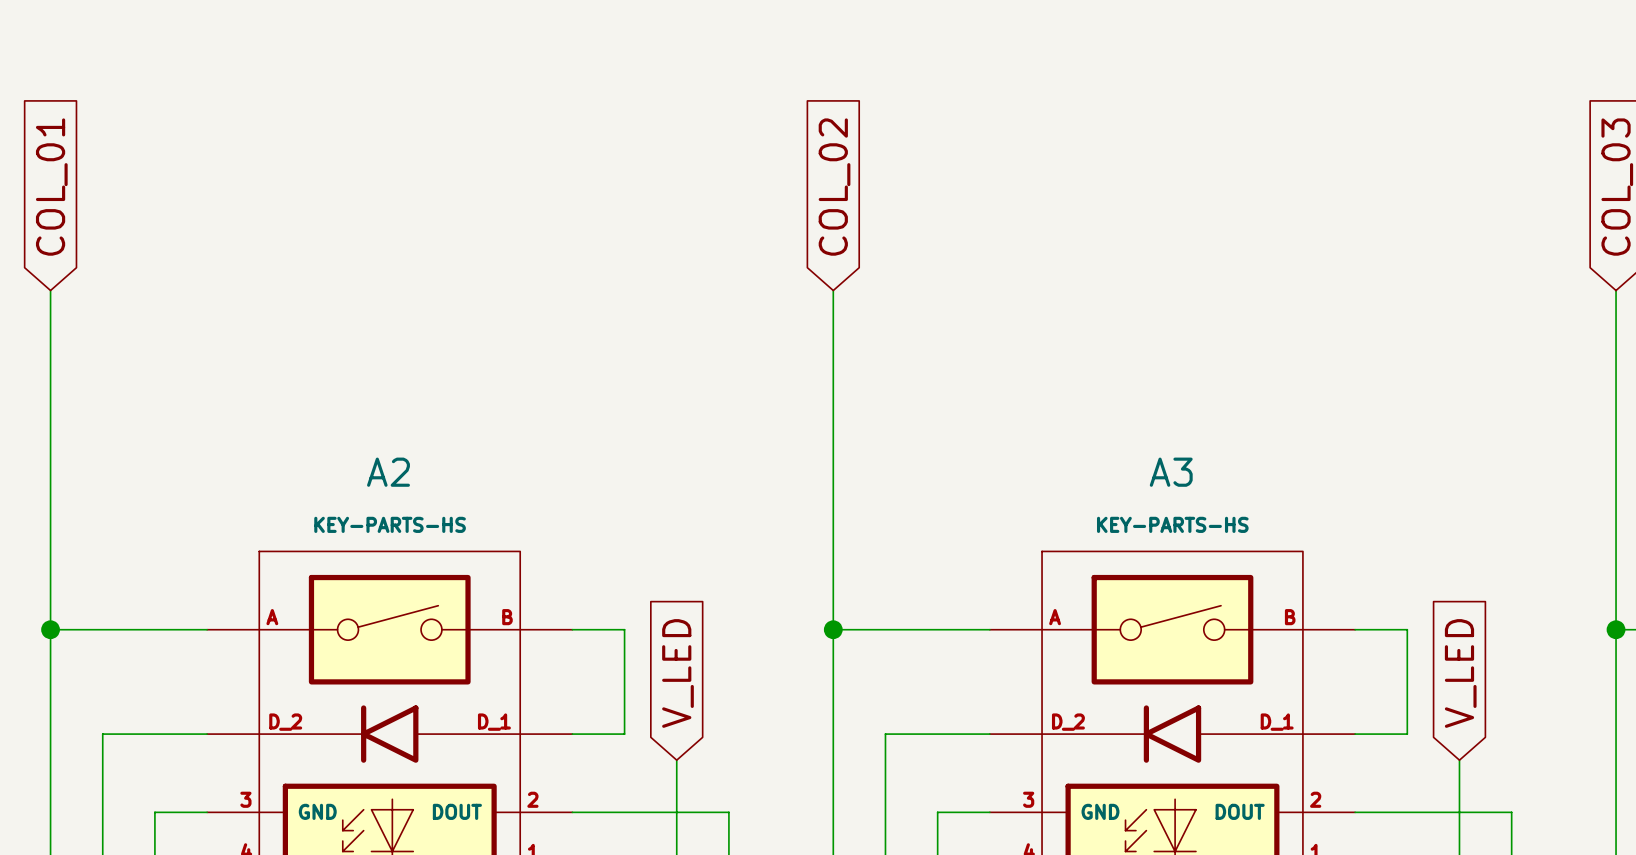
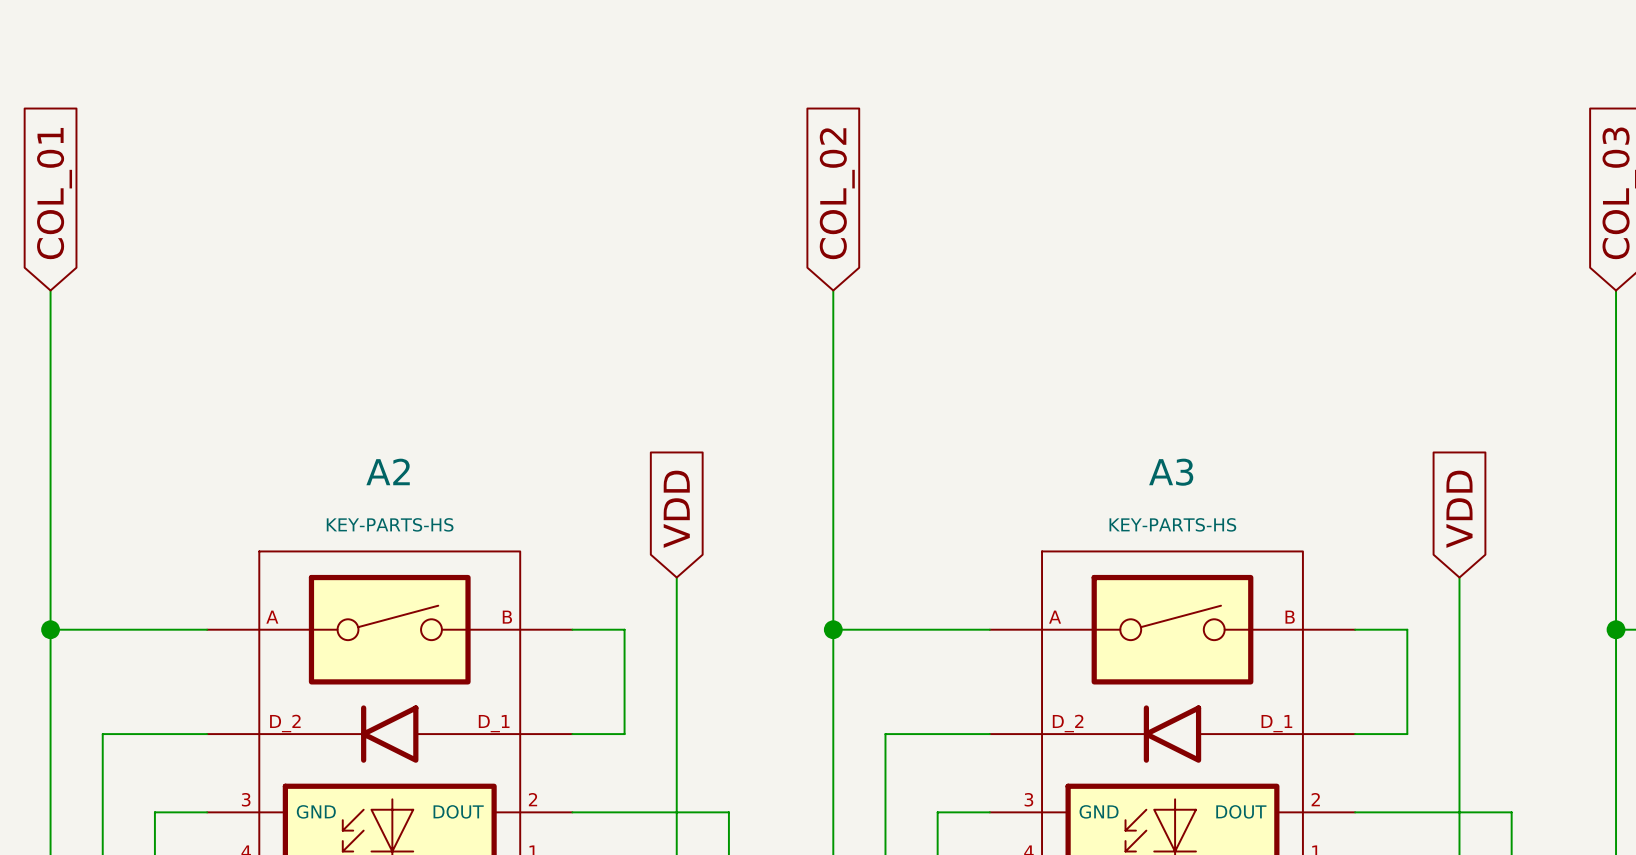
global label: none -> VDD (676, 509)
global label: none -> VDD (1459, 509)
wire: none -> (676, 577) (676, 760)
wire: none -> (1459, 577) (1459, 760)
global label: V_LED (677, 673) -> none
global label: V_LED (1460, 673) -> none

